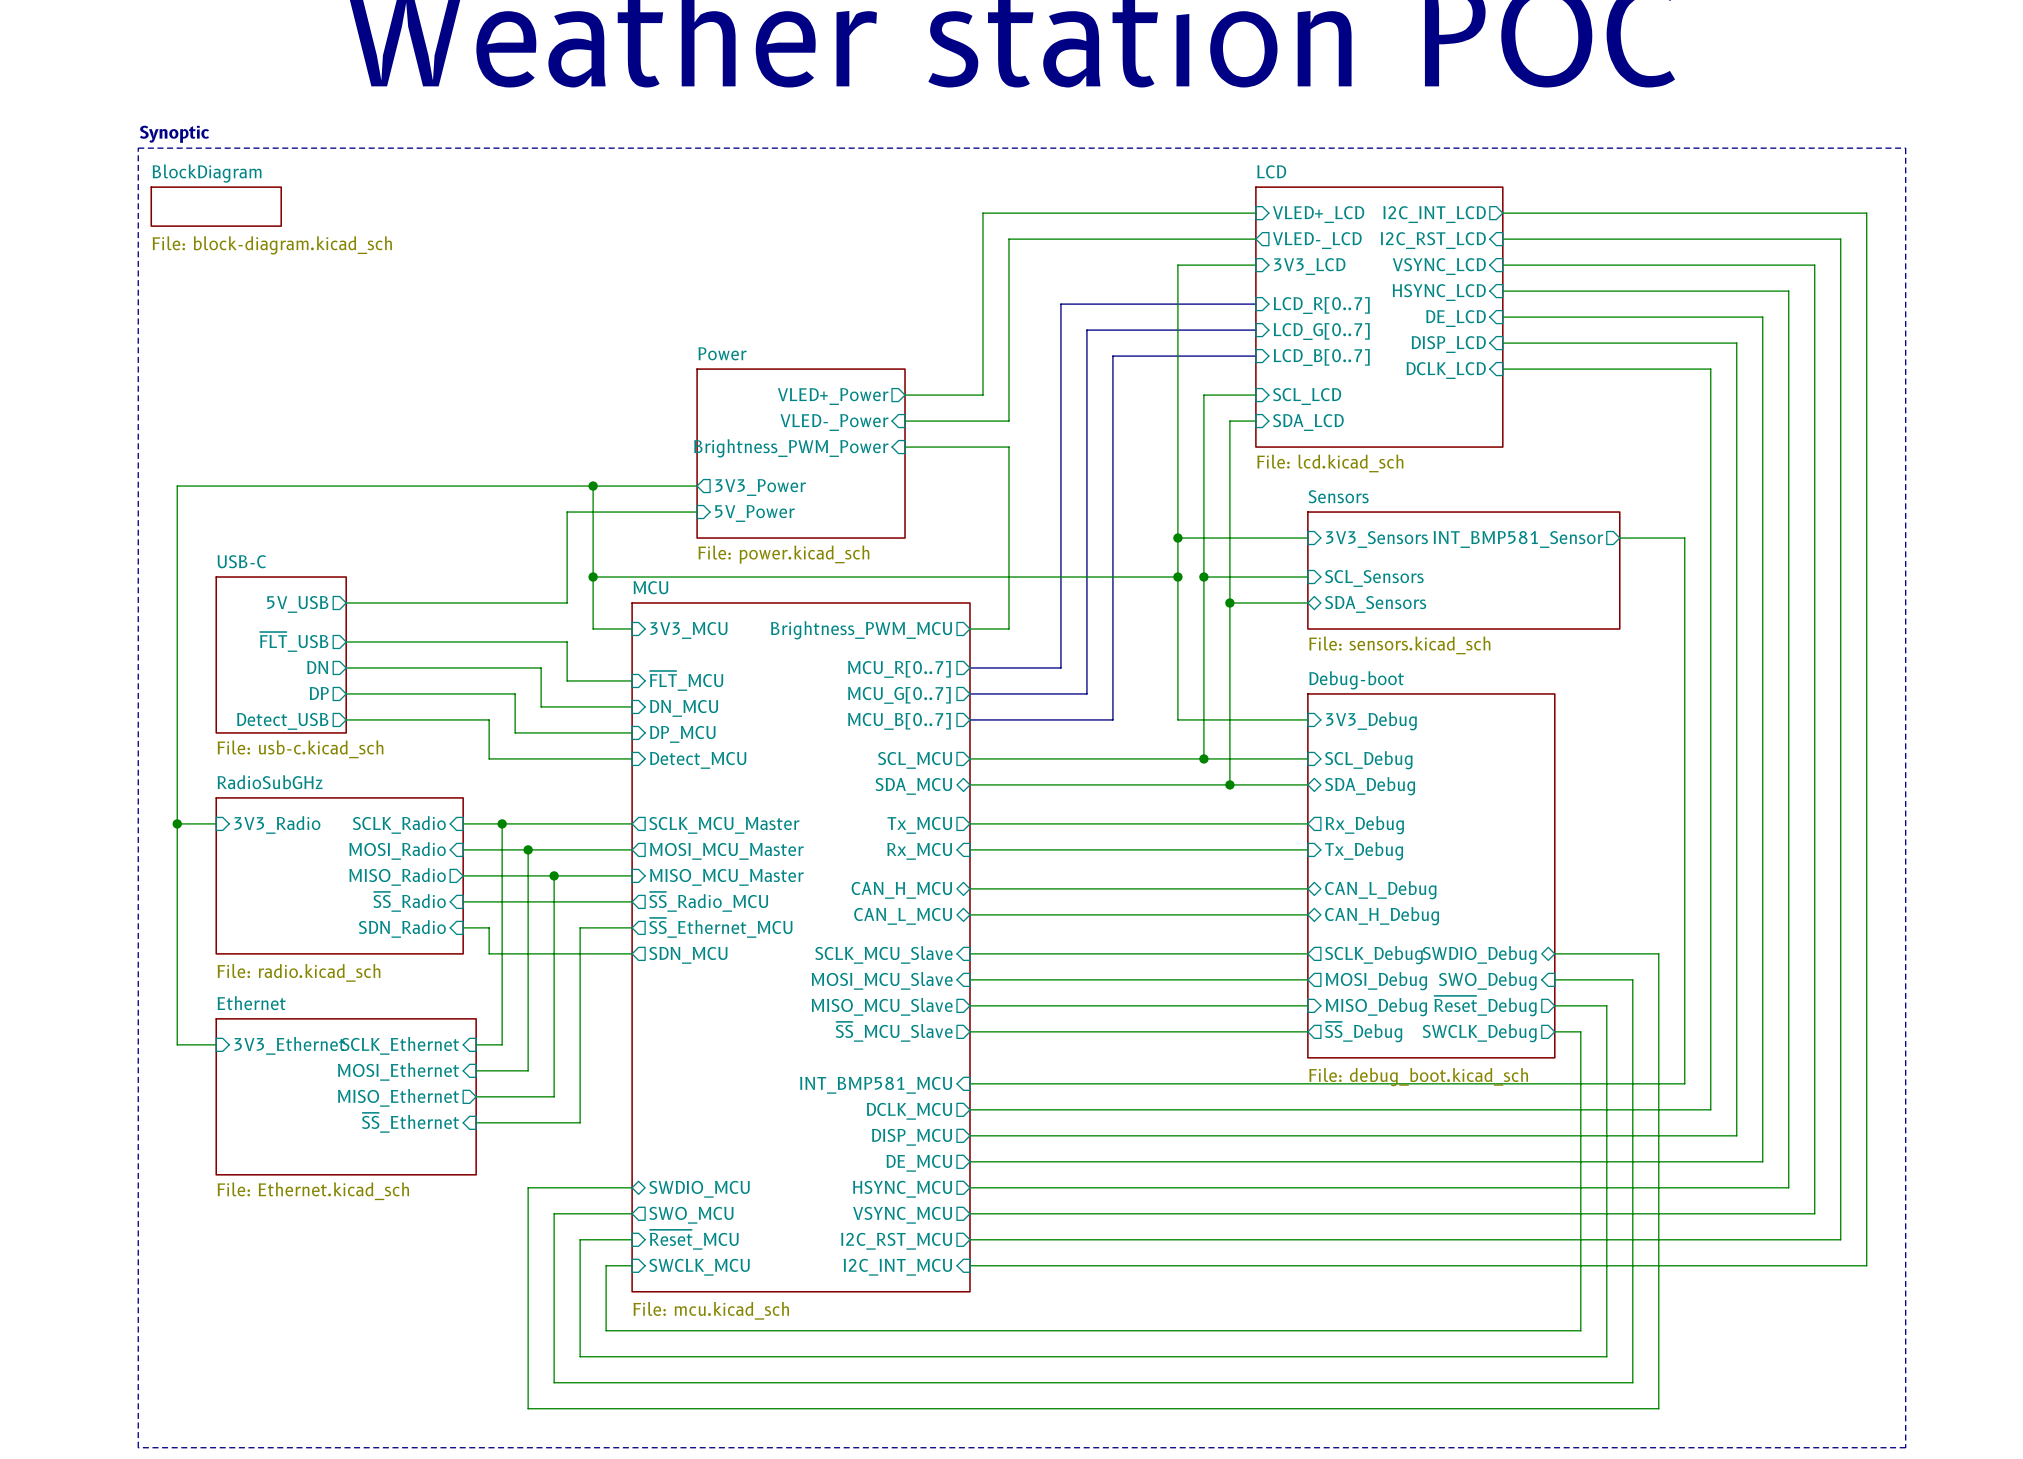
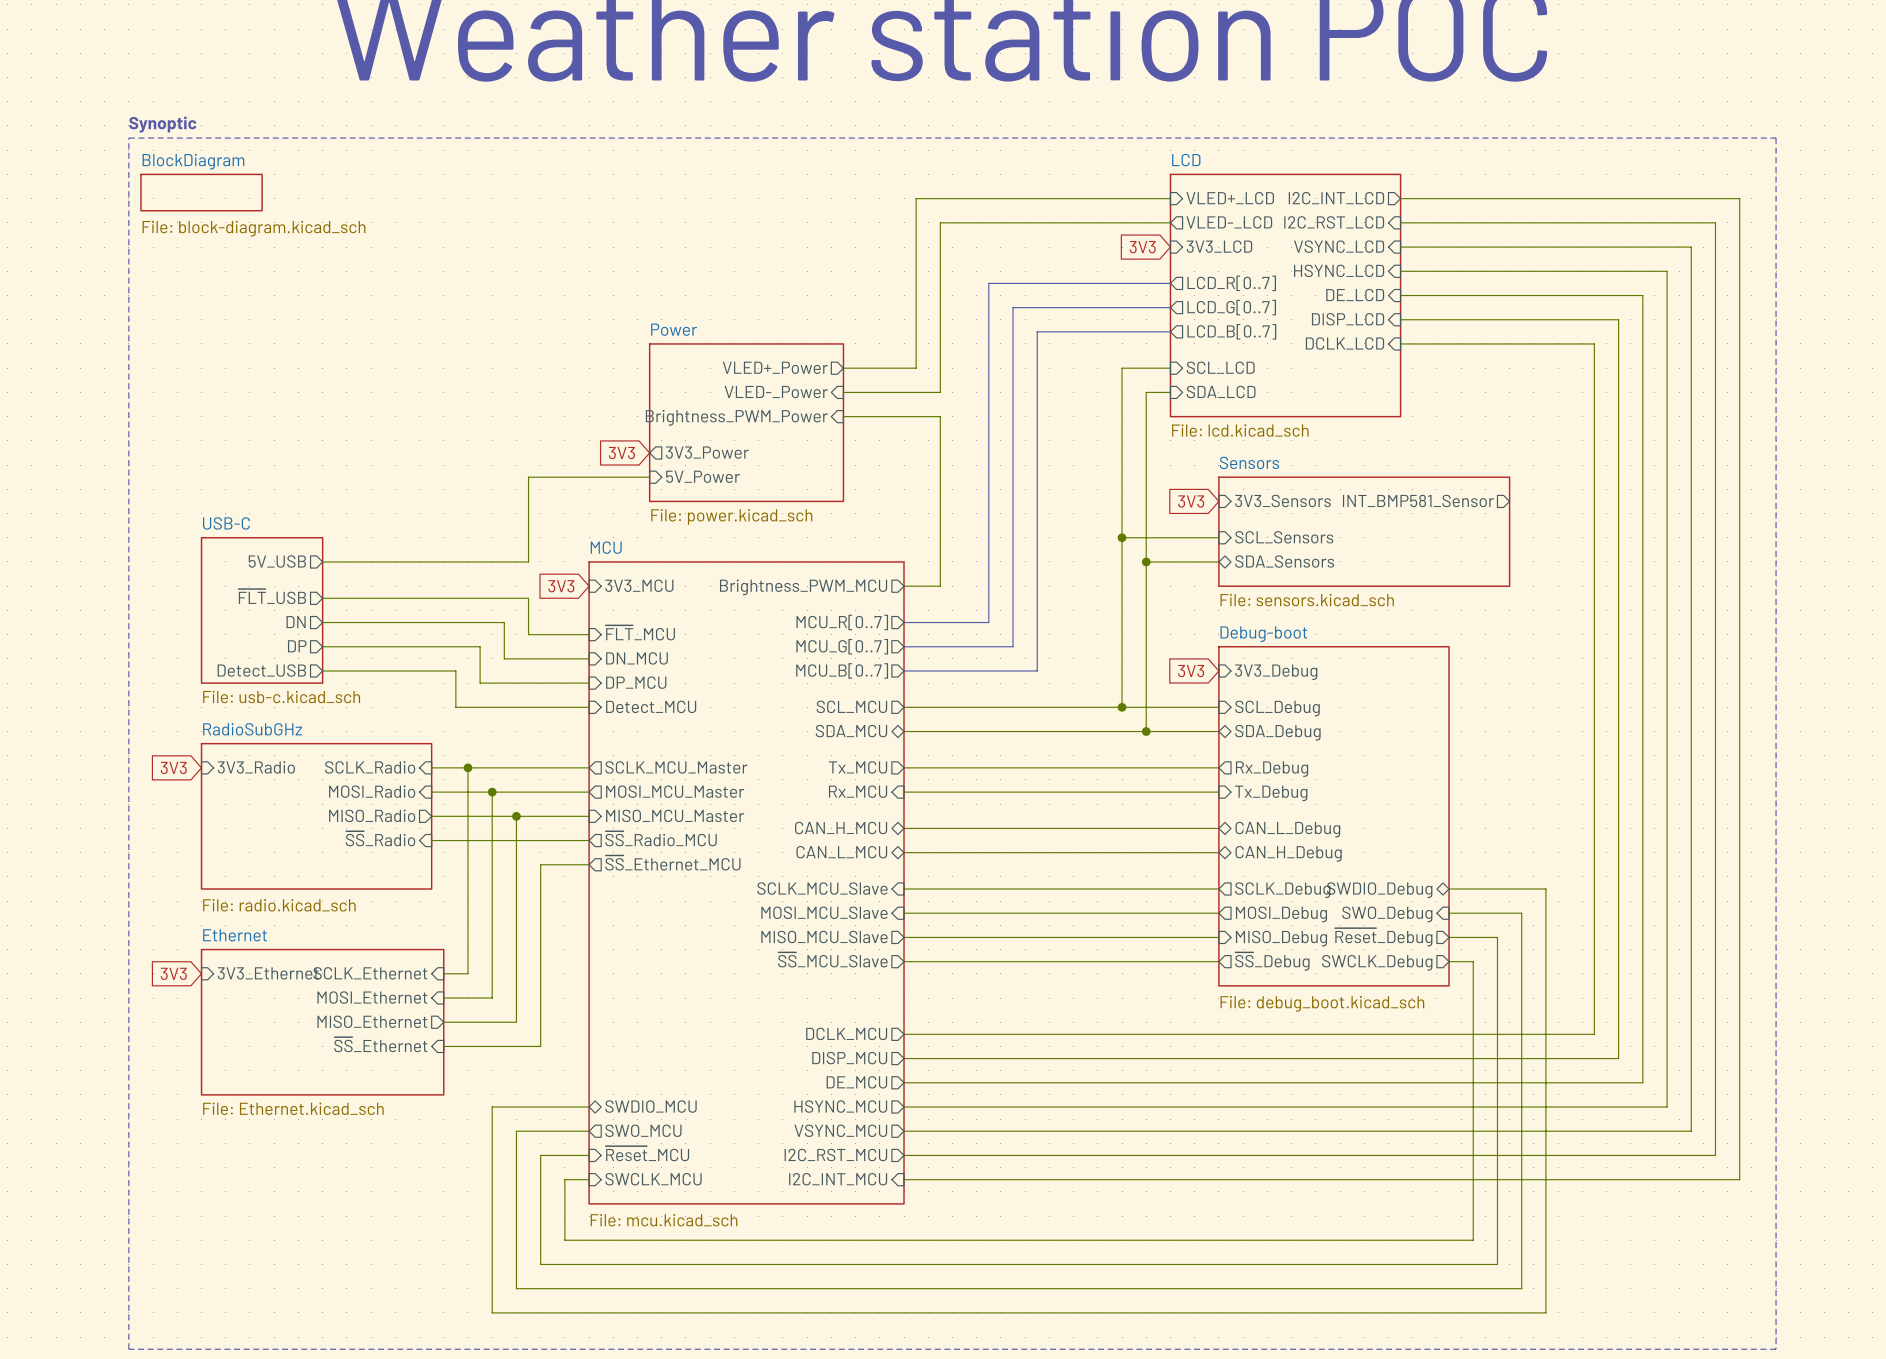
global label: none -> 3V3 (1142, 247)
wire: (1255, 265) (1177, 265) (1177, 719) (1307, 719) -> none
sheet pin shape: input (1321, 305) -> output (1231, 283)
sheet pin shape: input (1321, 331) -> output (1231, 307)
sheet pin shape: input (1321, 357) -> output (1231, 331)
wire: (593, 486) (593, 628) (632, 628) -> none
junction: (593, 486) -> none
global label: none -> 3V3 (621, 453)
wire: (697, 486) (177, 486) (177, 1044) (216, 1044) -> none
wire: (1177, 538) (1307, 538) -> none
junction: (1177, 538) -> none
global label: none -> 3V3 (1191, 501)
wire: (1619, 538) (1684, 538) (1684, 1083) (969, 1083) -> none
wire: (593, 577) (1177, 577) -> none
junction: (593, 577) -> none
junction: (1177, 577) -> none
global label: none -> 3V3 (561, 586)
global label: none -> 3V3 (1191, 671)
wire: (177, 823) (216, 823) -> none
junction: (177, 823) -> none
global label: none -> 3V3 (173, 767)
wire: (463, 927) (489, 927) (489, 953) (632, 953) -> none
sheet pin: SDN_Radio (402, 928) -> none
sheet pin: SDN_MCU (688, 955) -> none
global label: none -> 3V3 (173, 973)
sheet pin: INT_BMP581_MCU (876, 1085) -> none

